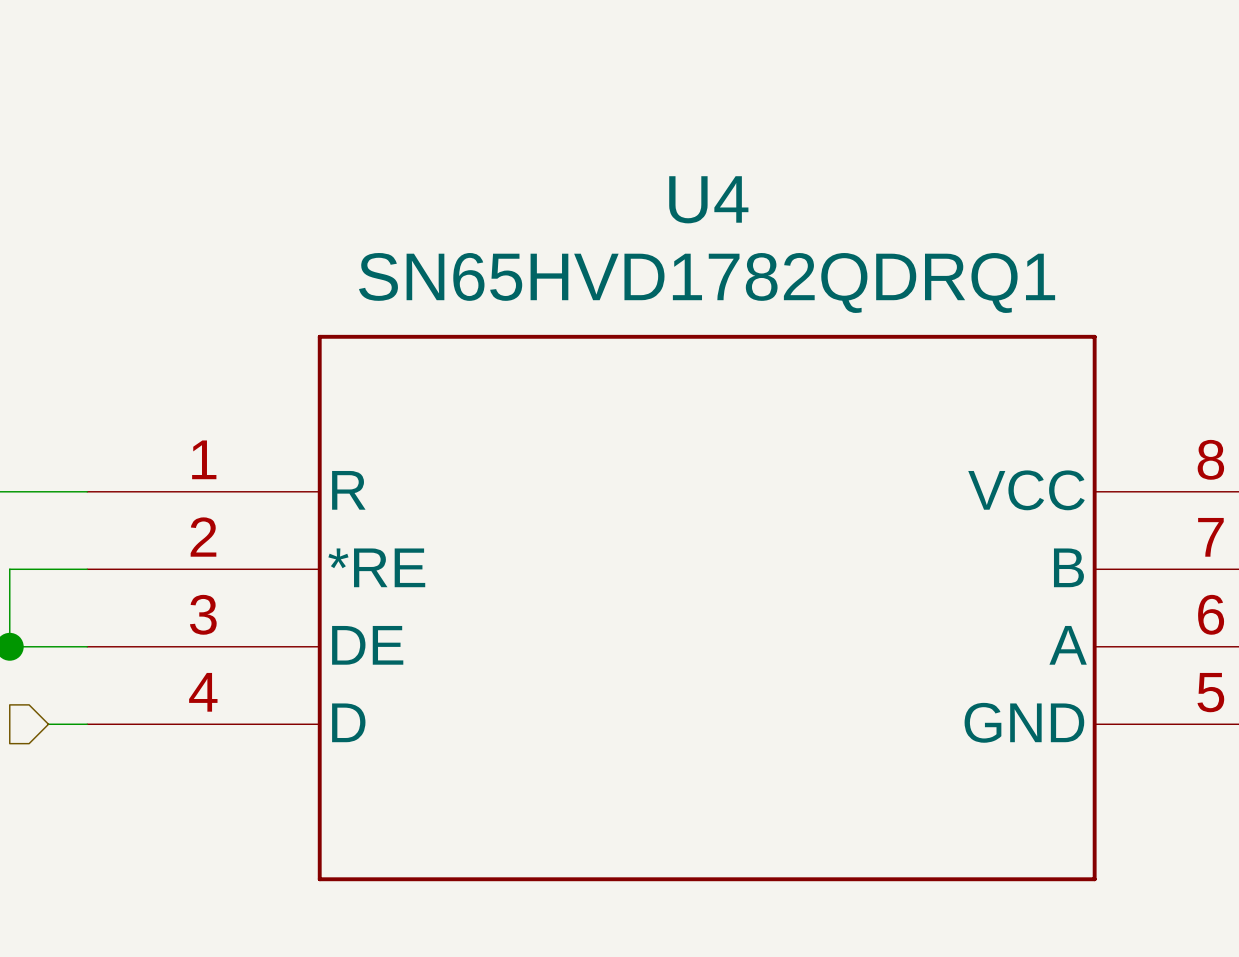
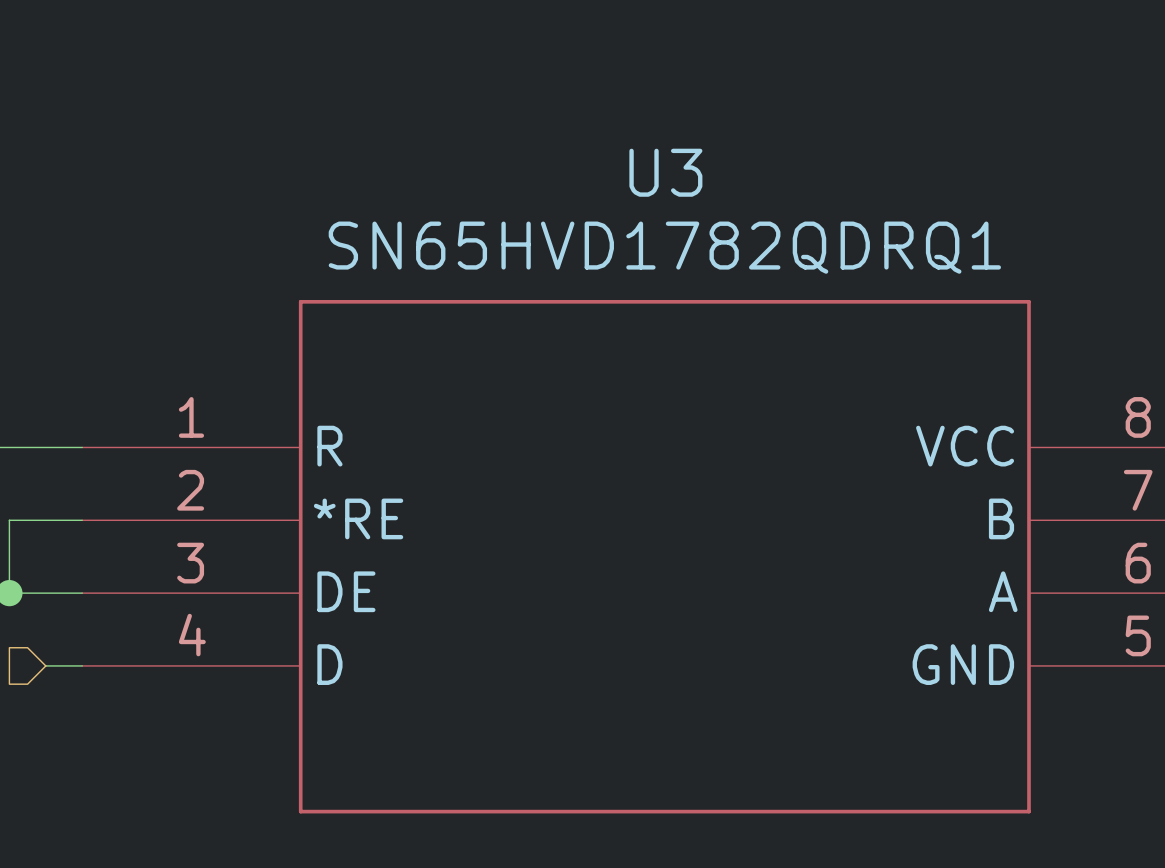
U4 name: U4 (708, 199) -> U3 (665, 172)

